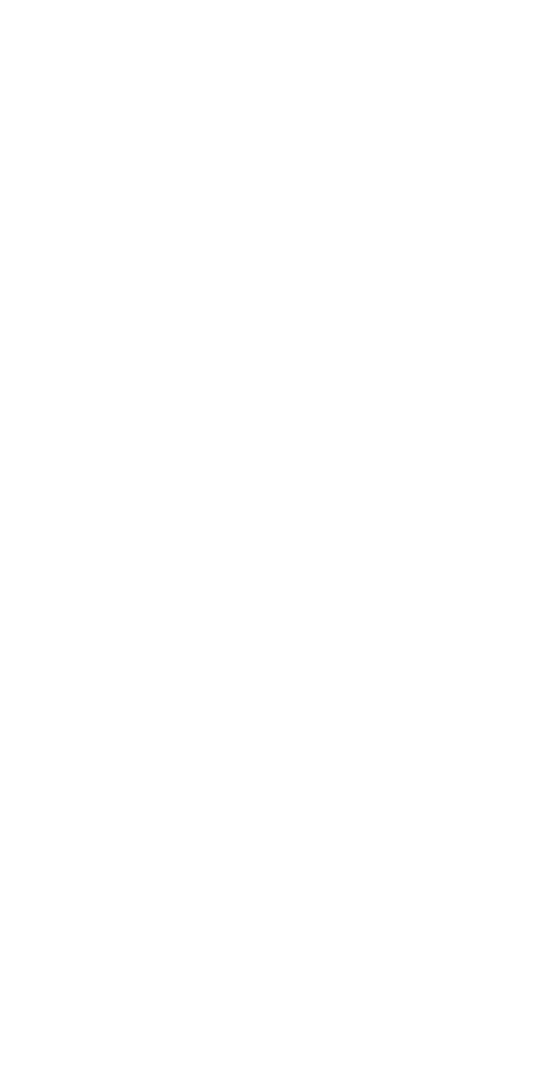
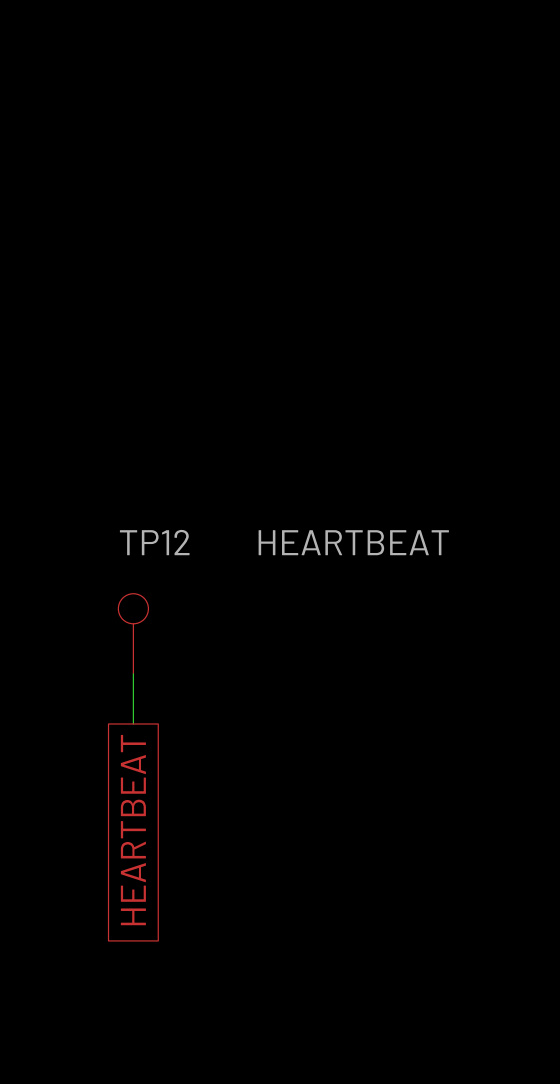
TP12: none -> HEARTBEAT (133, 633)
wire: none -> (133, 673) (133, 723)
global label: none -> HEARTBEAT (133, 830)

